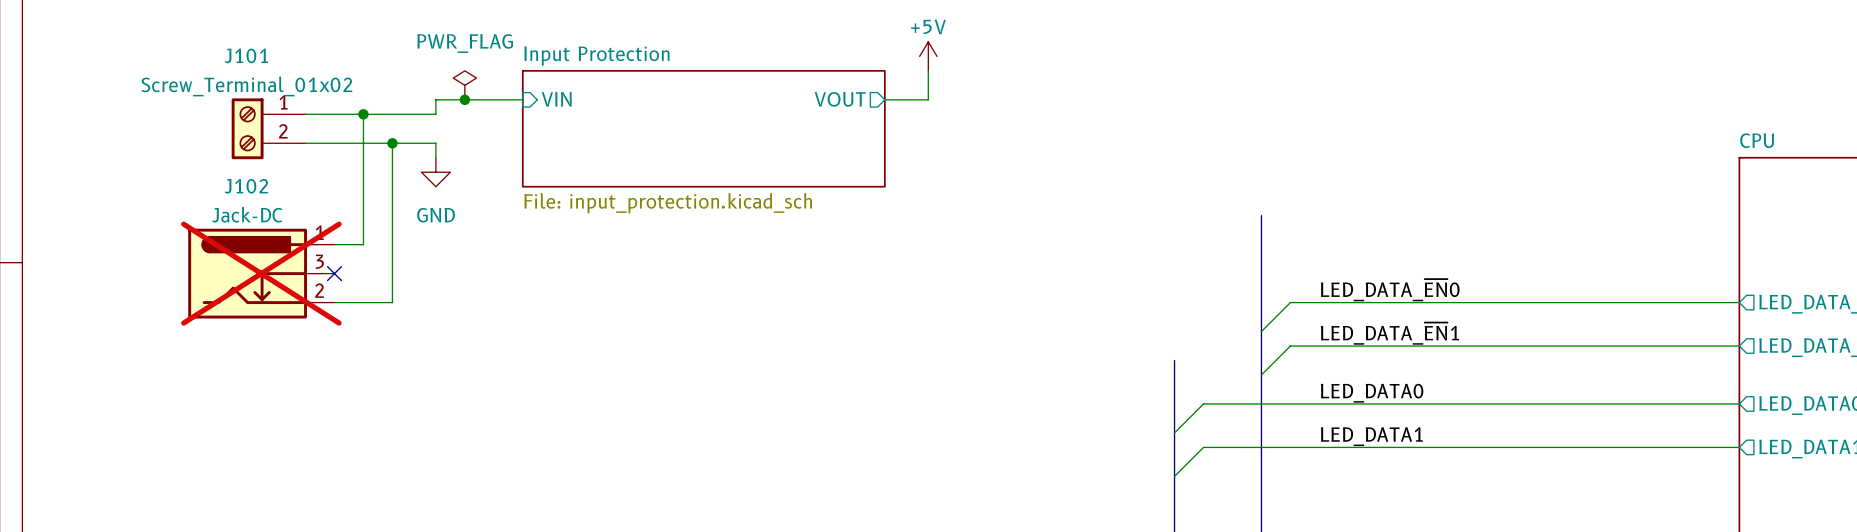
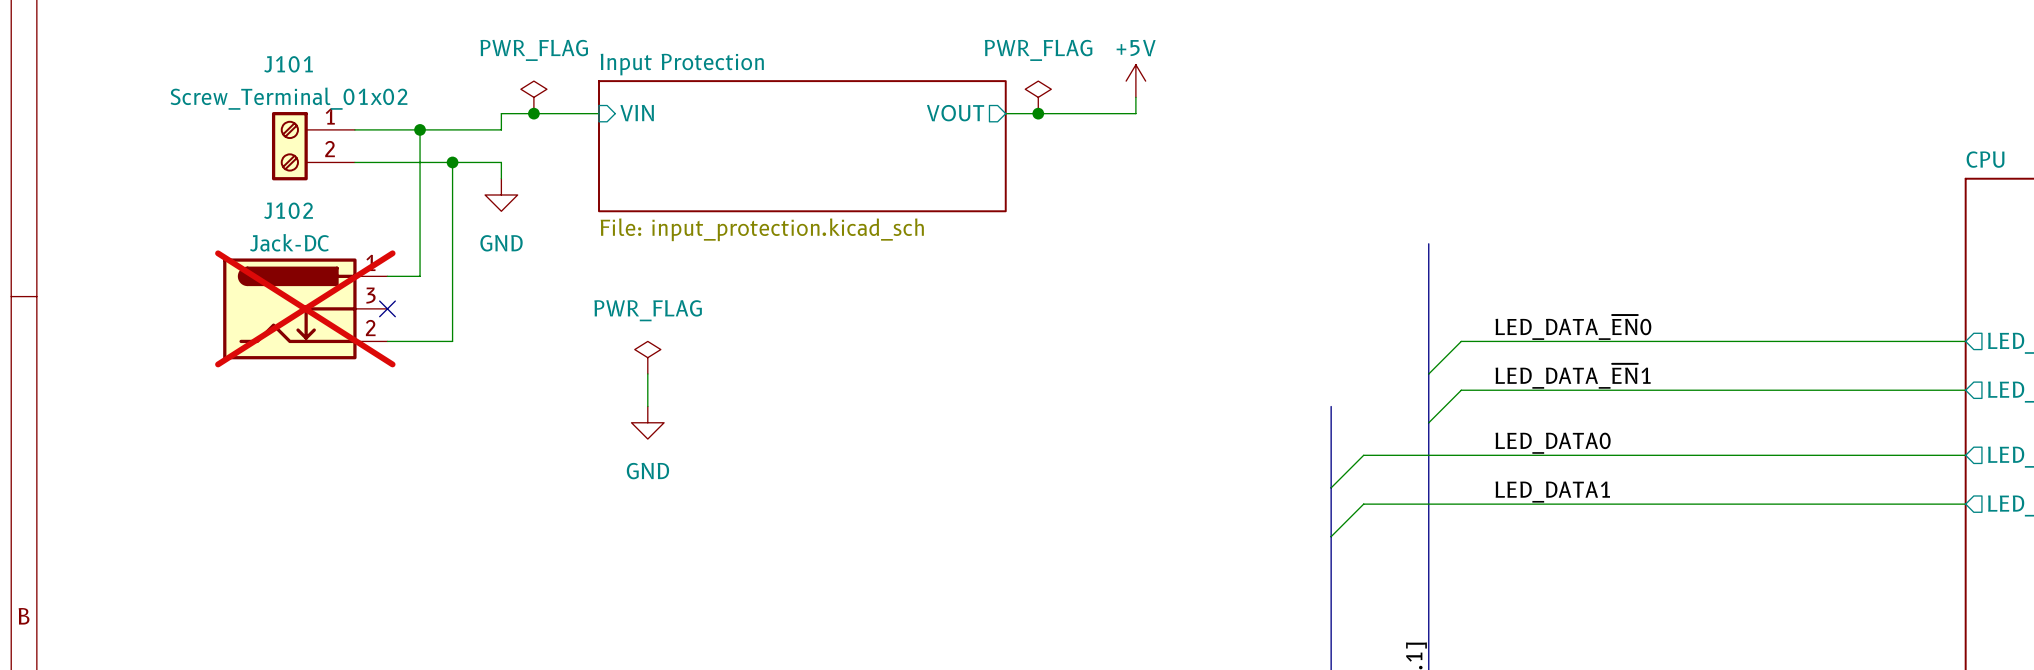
power symbol position: +5V (928, 56) -> +5V (1135, 81)
wire: (928, 70) (928, 99) -> (1135, 97) (1135, 113) (1054, 113)
power symbol: none -> PWR_FLAG (1038, 97)
junction: none -> (1038, 113)
power symbol: none -> PWR_FLAG (647, 357)
wire: none -> (647, 373) (647, 406)
power symbol: none -> GND (647, 422)

